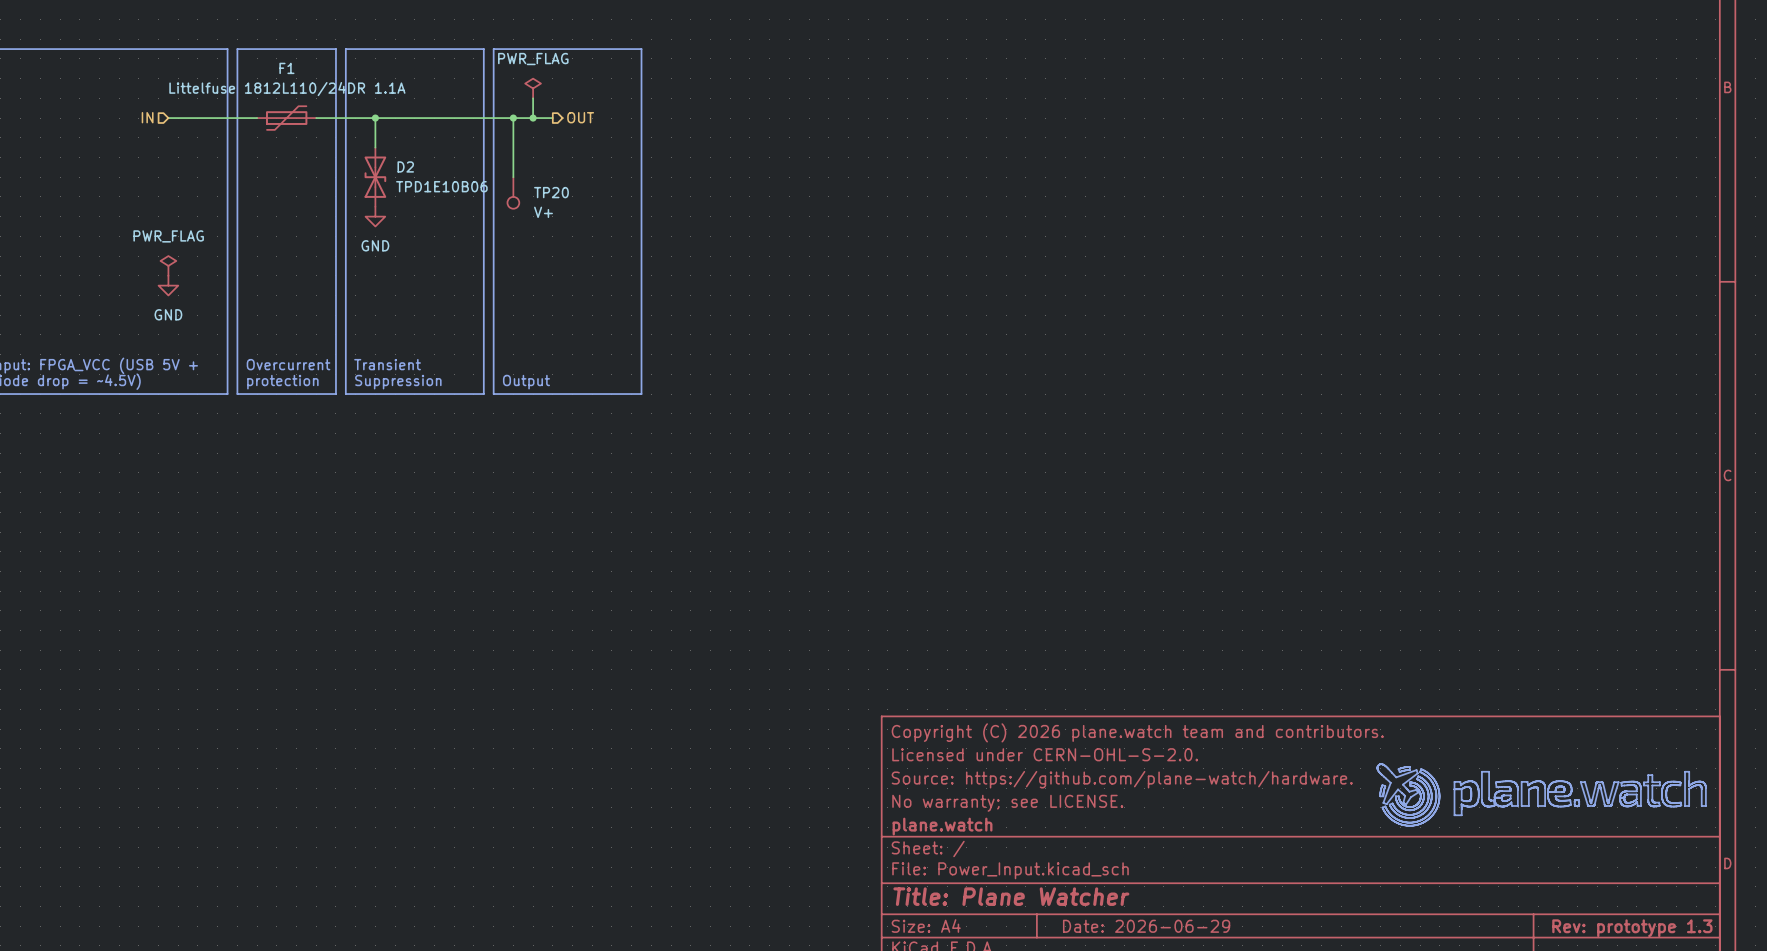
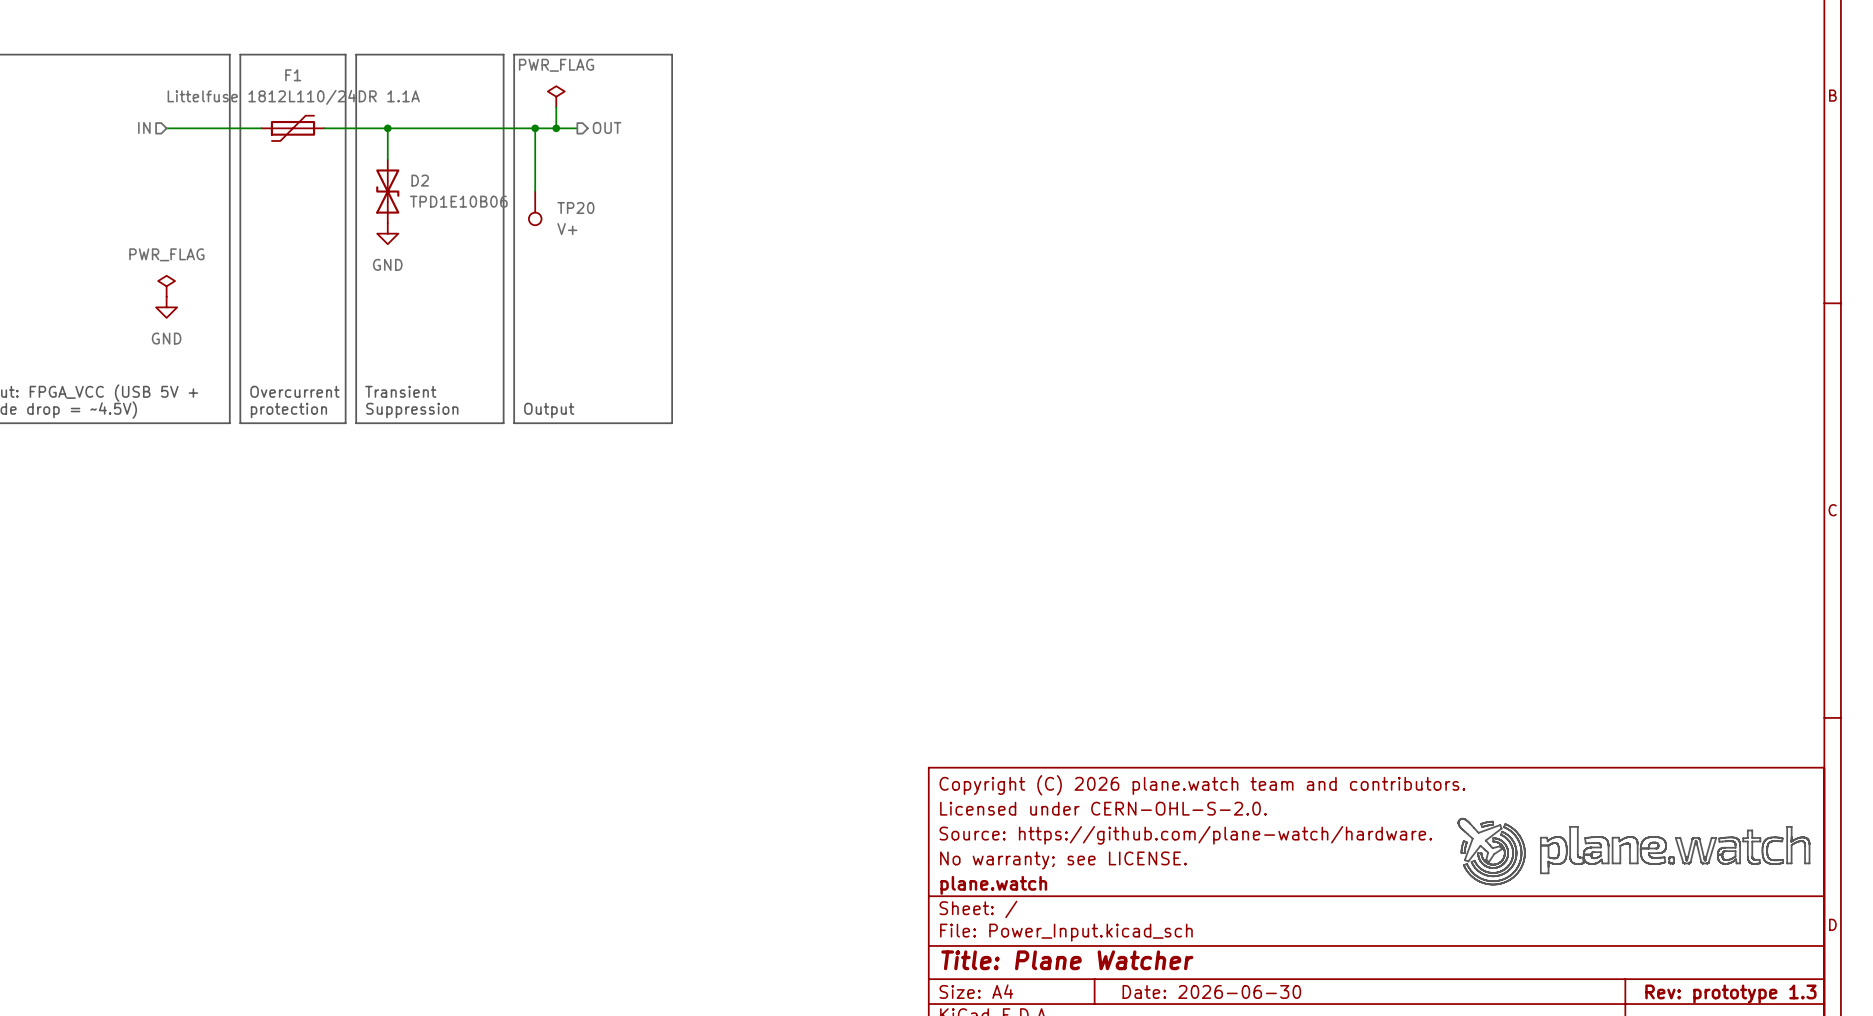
title block: Date: 2026-06-29 (1146, 926) -> Date: 2026-06-30 (1211, 991)

